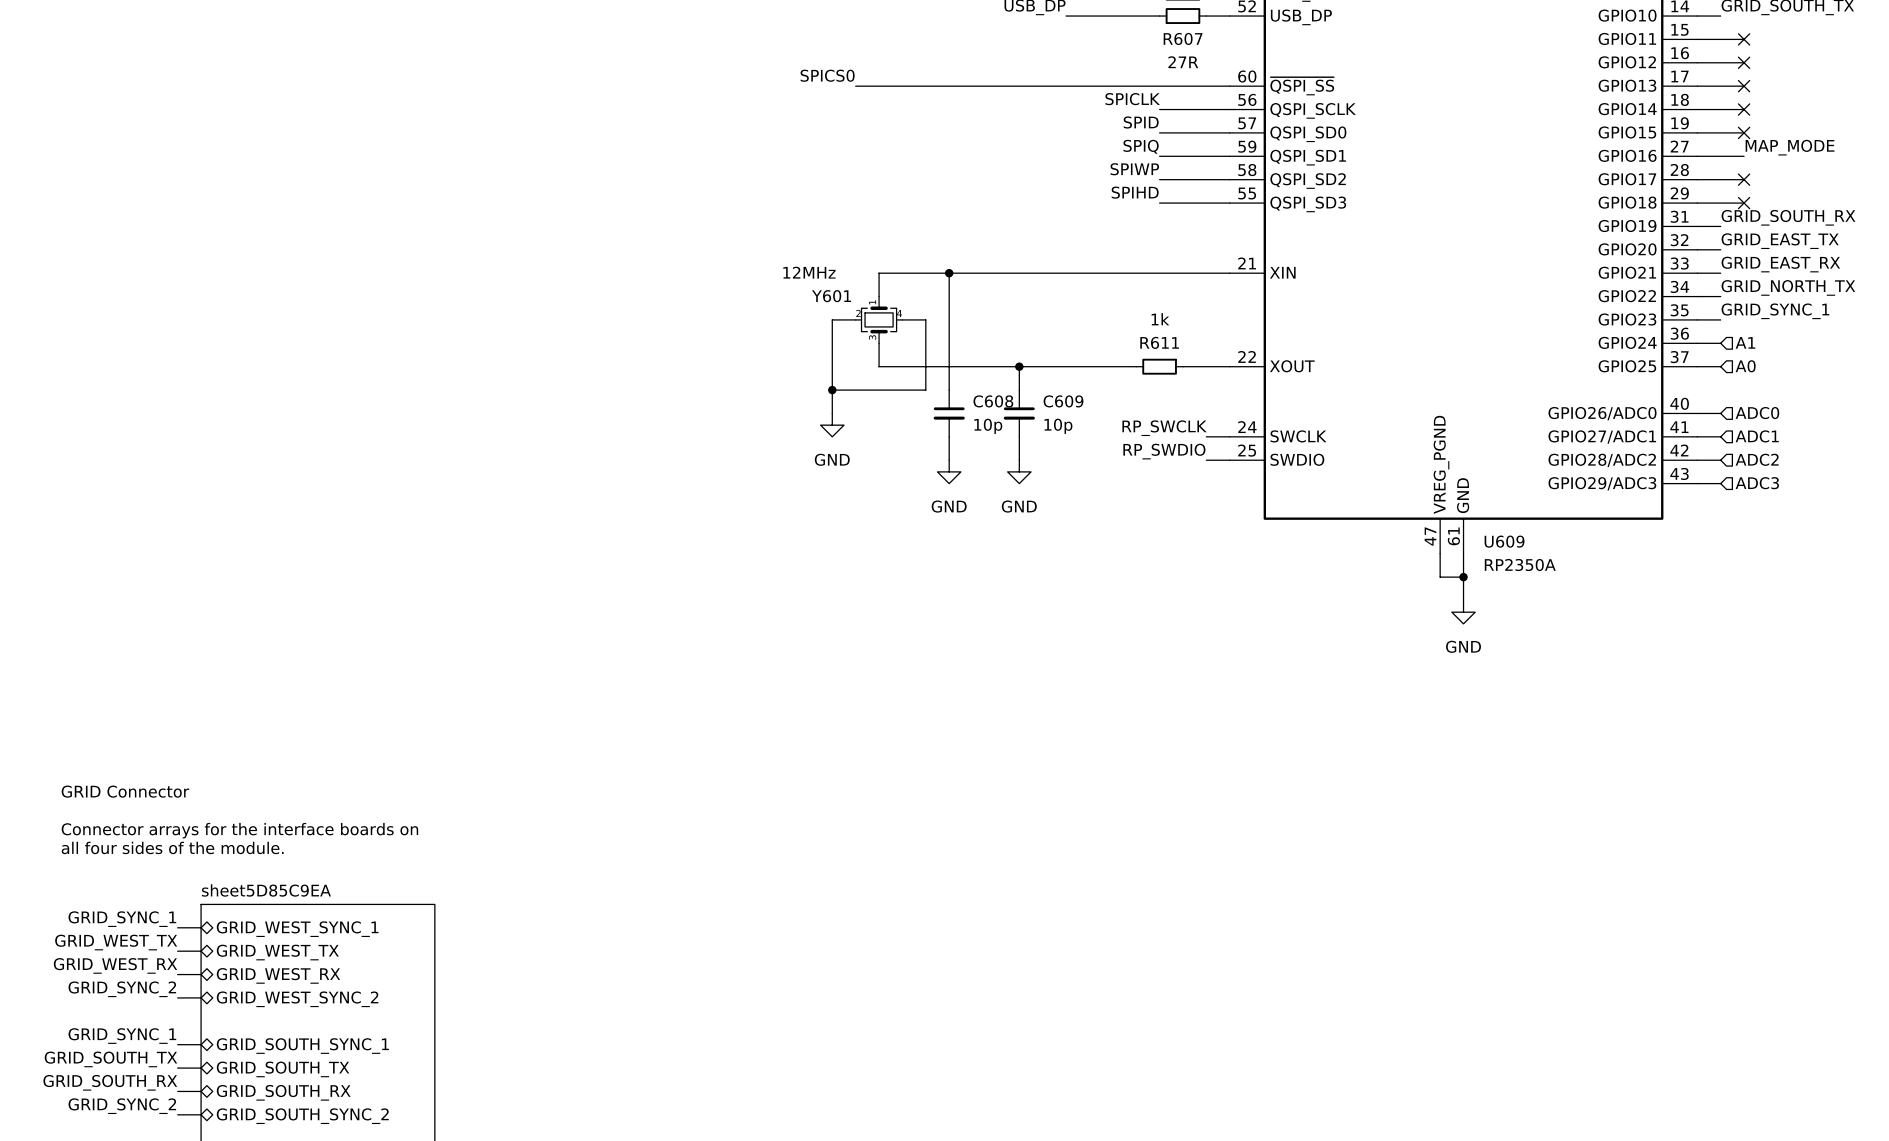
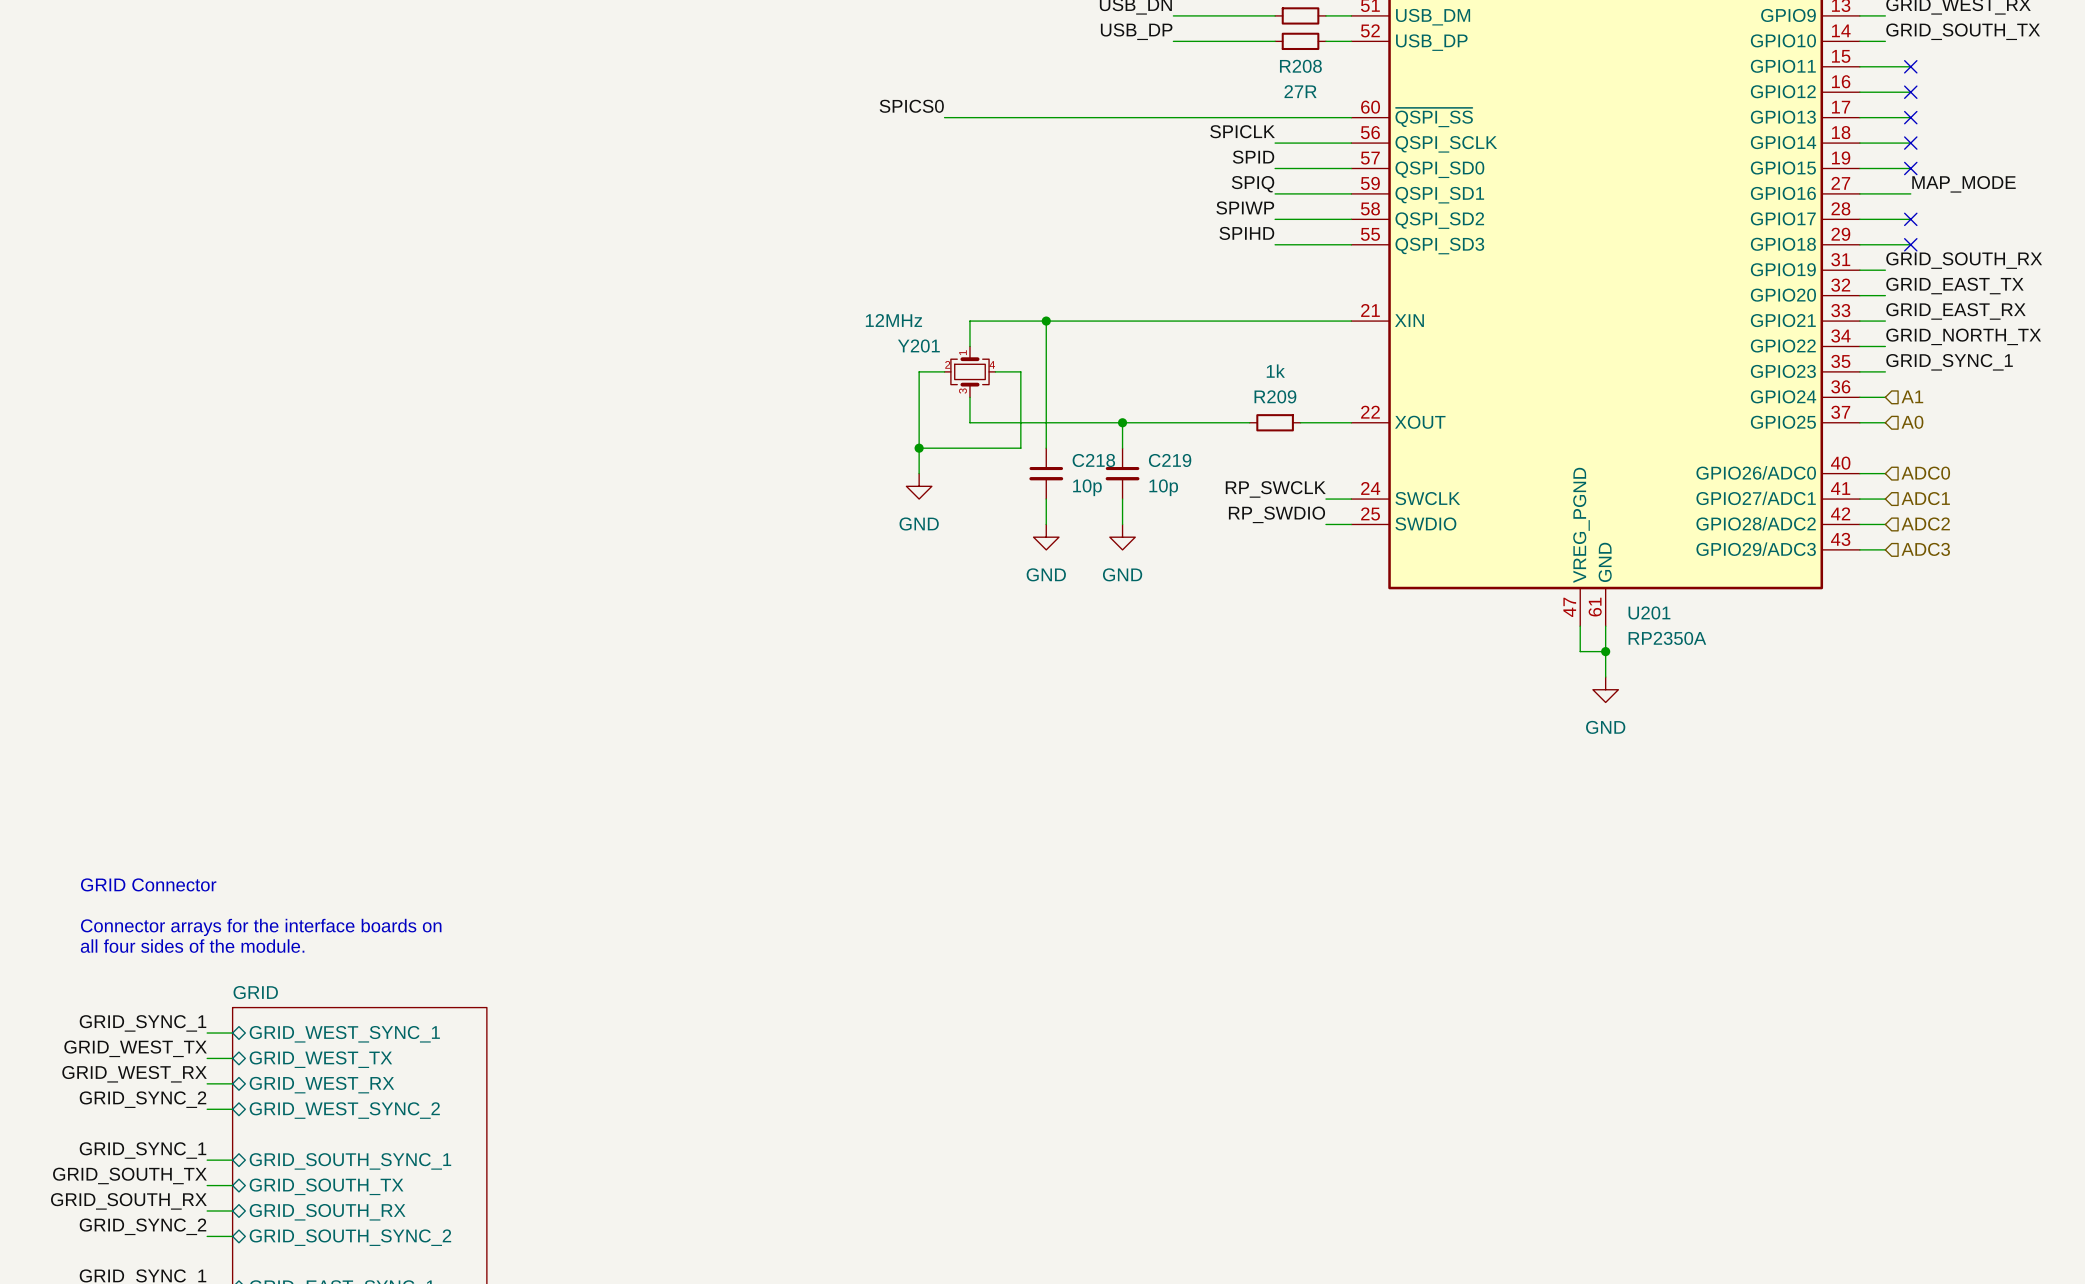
R607 name: R607 (1183, 38) -> R208 (1300, 66)
Y601 name: Y601 (831, 296) -> Y201 (918, 346)
R611 name: R611 (1159, 342) -> R209 (1275, 396)
C608 name: C608 (993, 401) -> C218 (1093, 460)
C609 name: C609 (1063, 401) -> C219 (1170, 460)
U609 name: U609 (1504, 541) -> U201 (1649, 612)
sheet sheet5D85C9EA name: sheet5D85C9EA (266, 890) -> GRID (255, 992)

